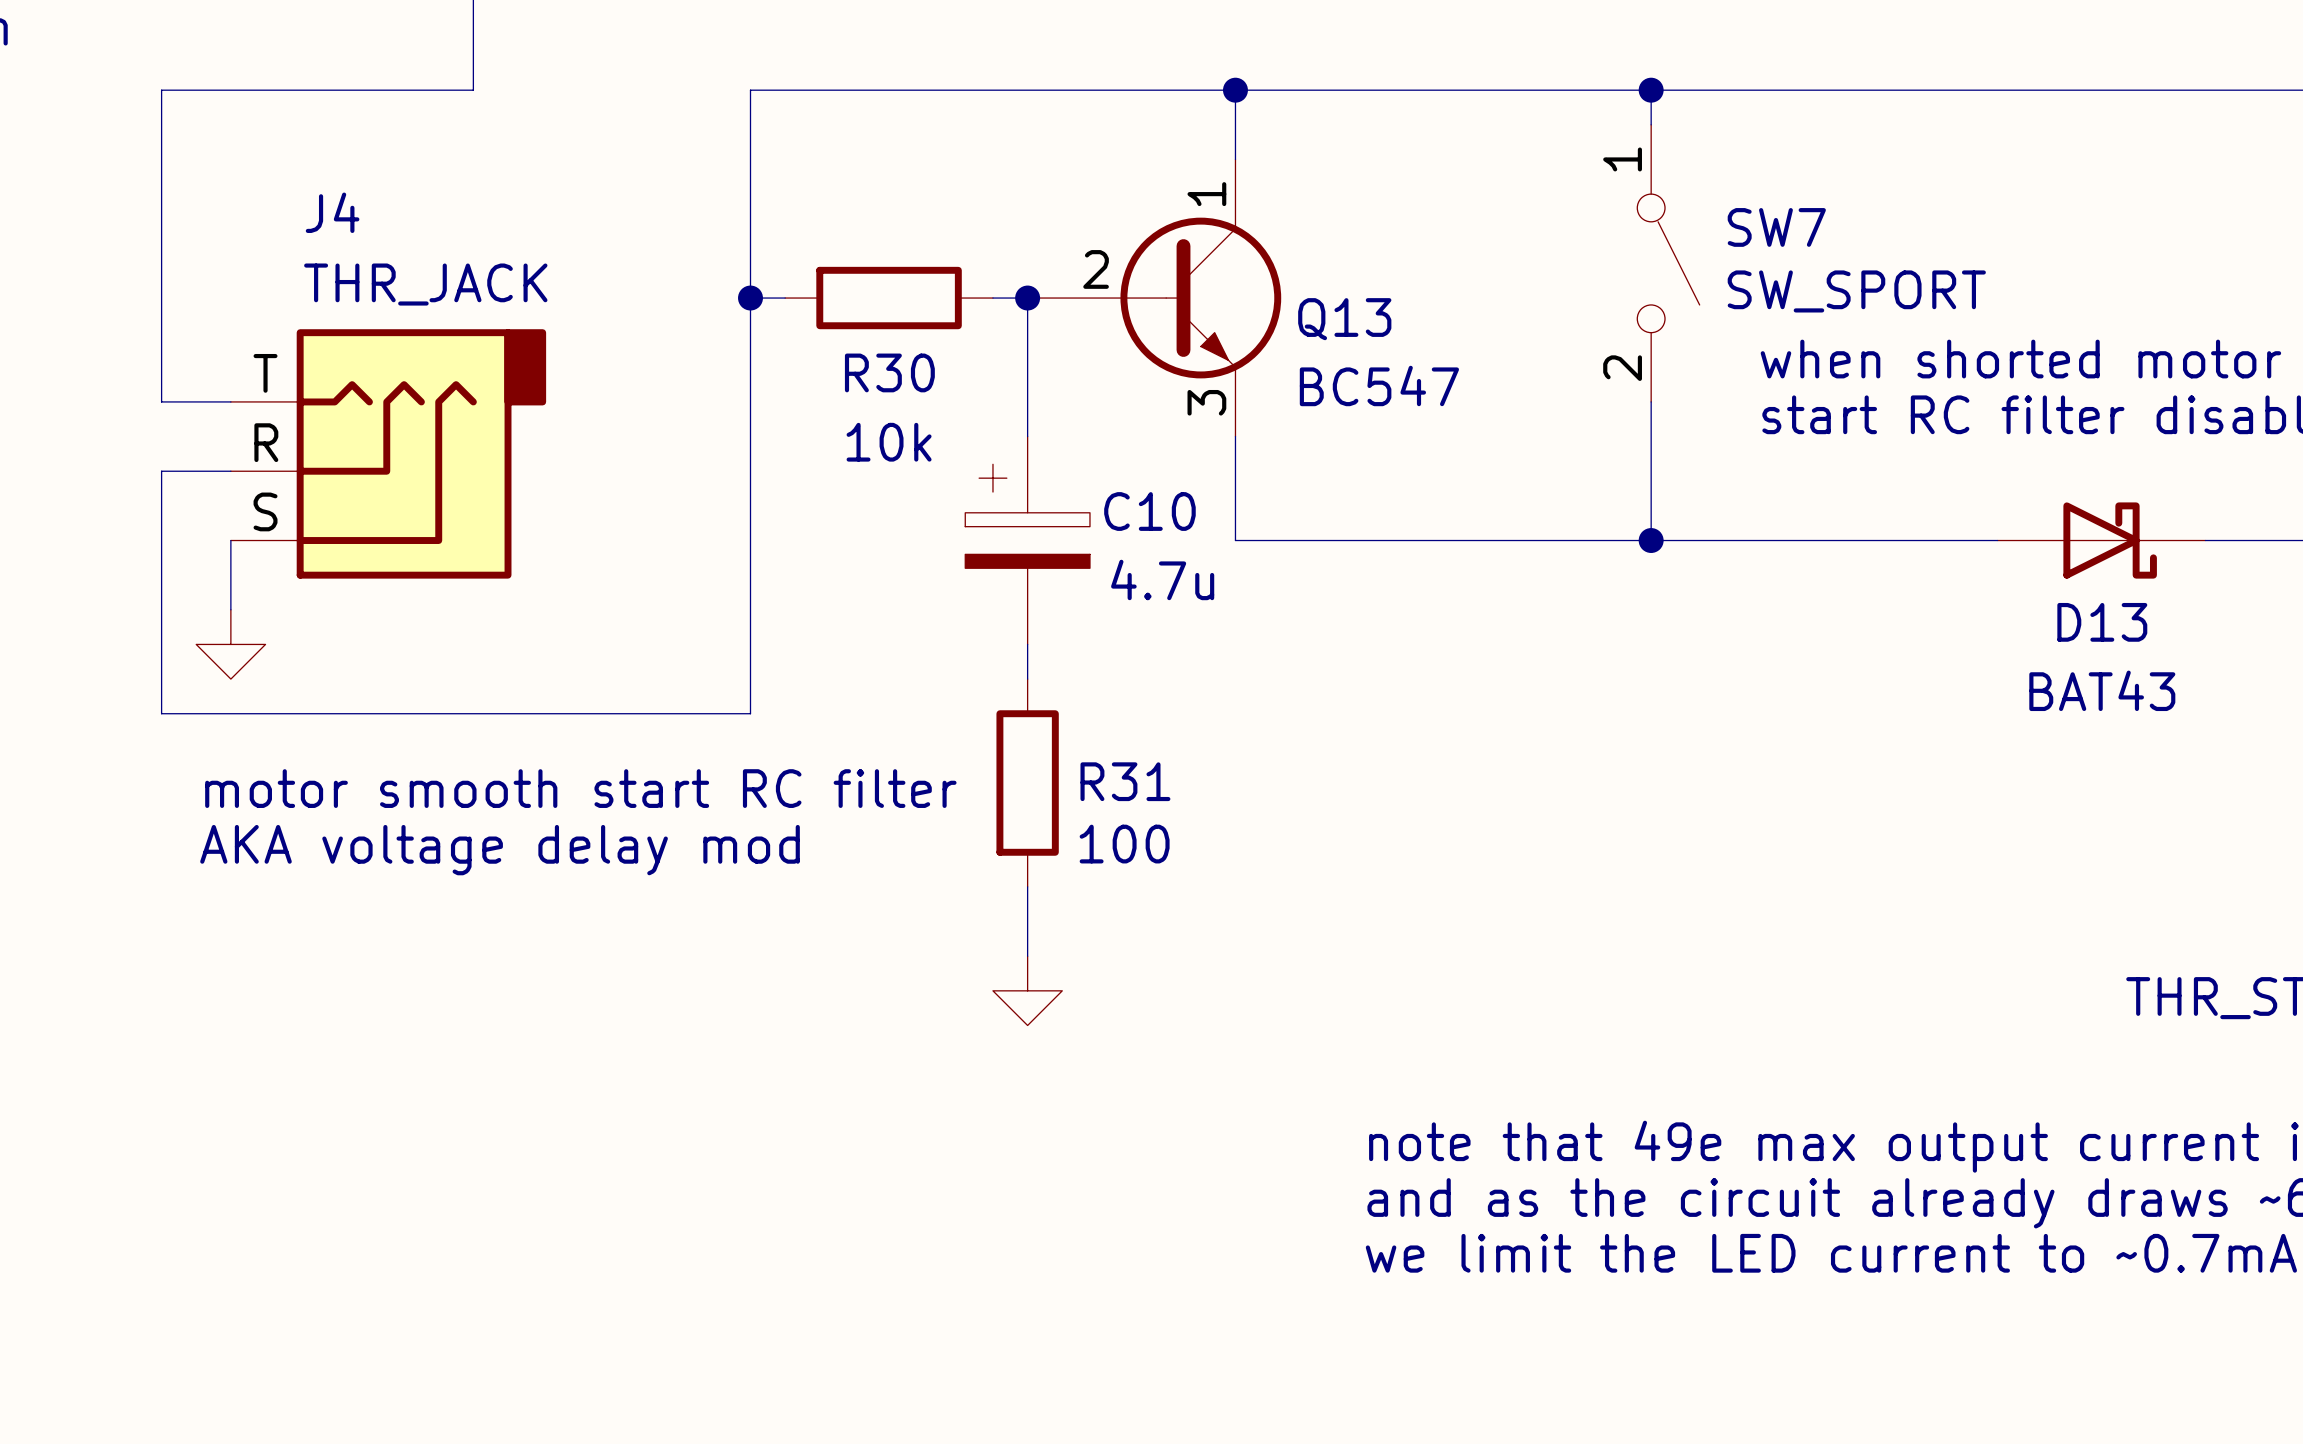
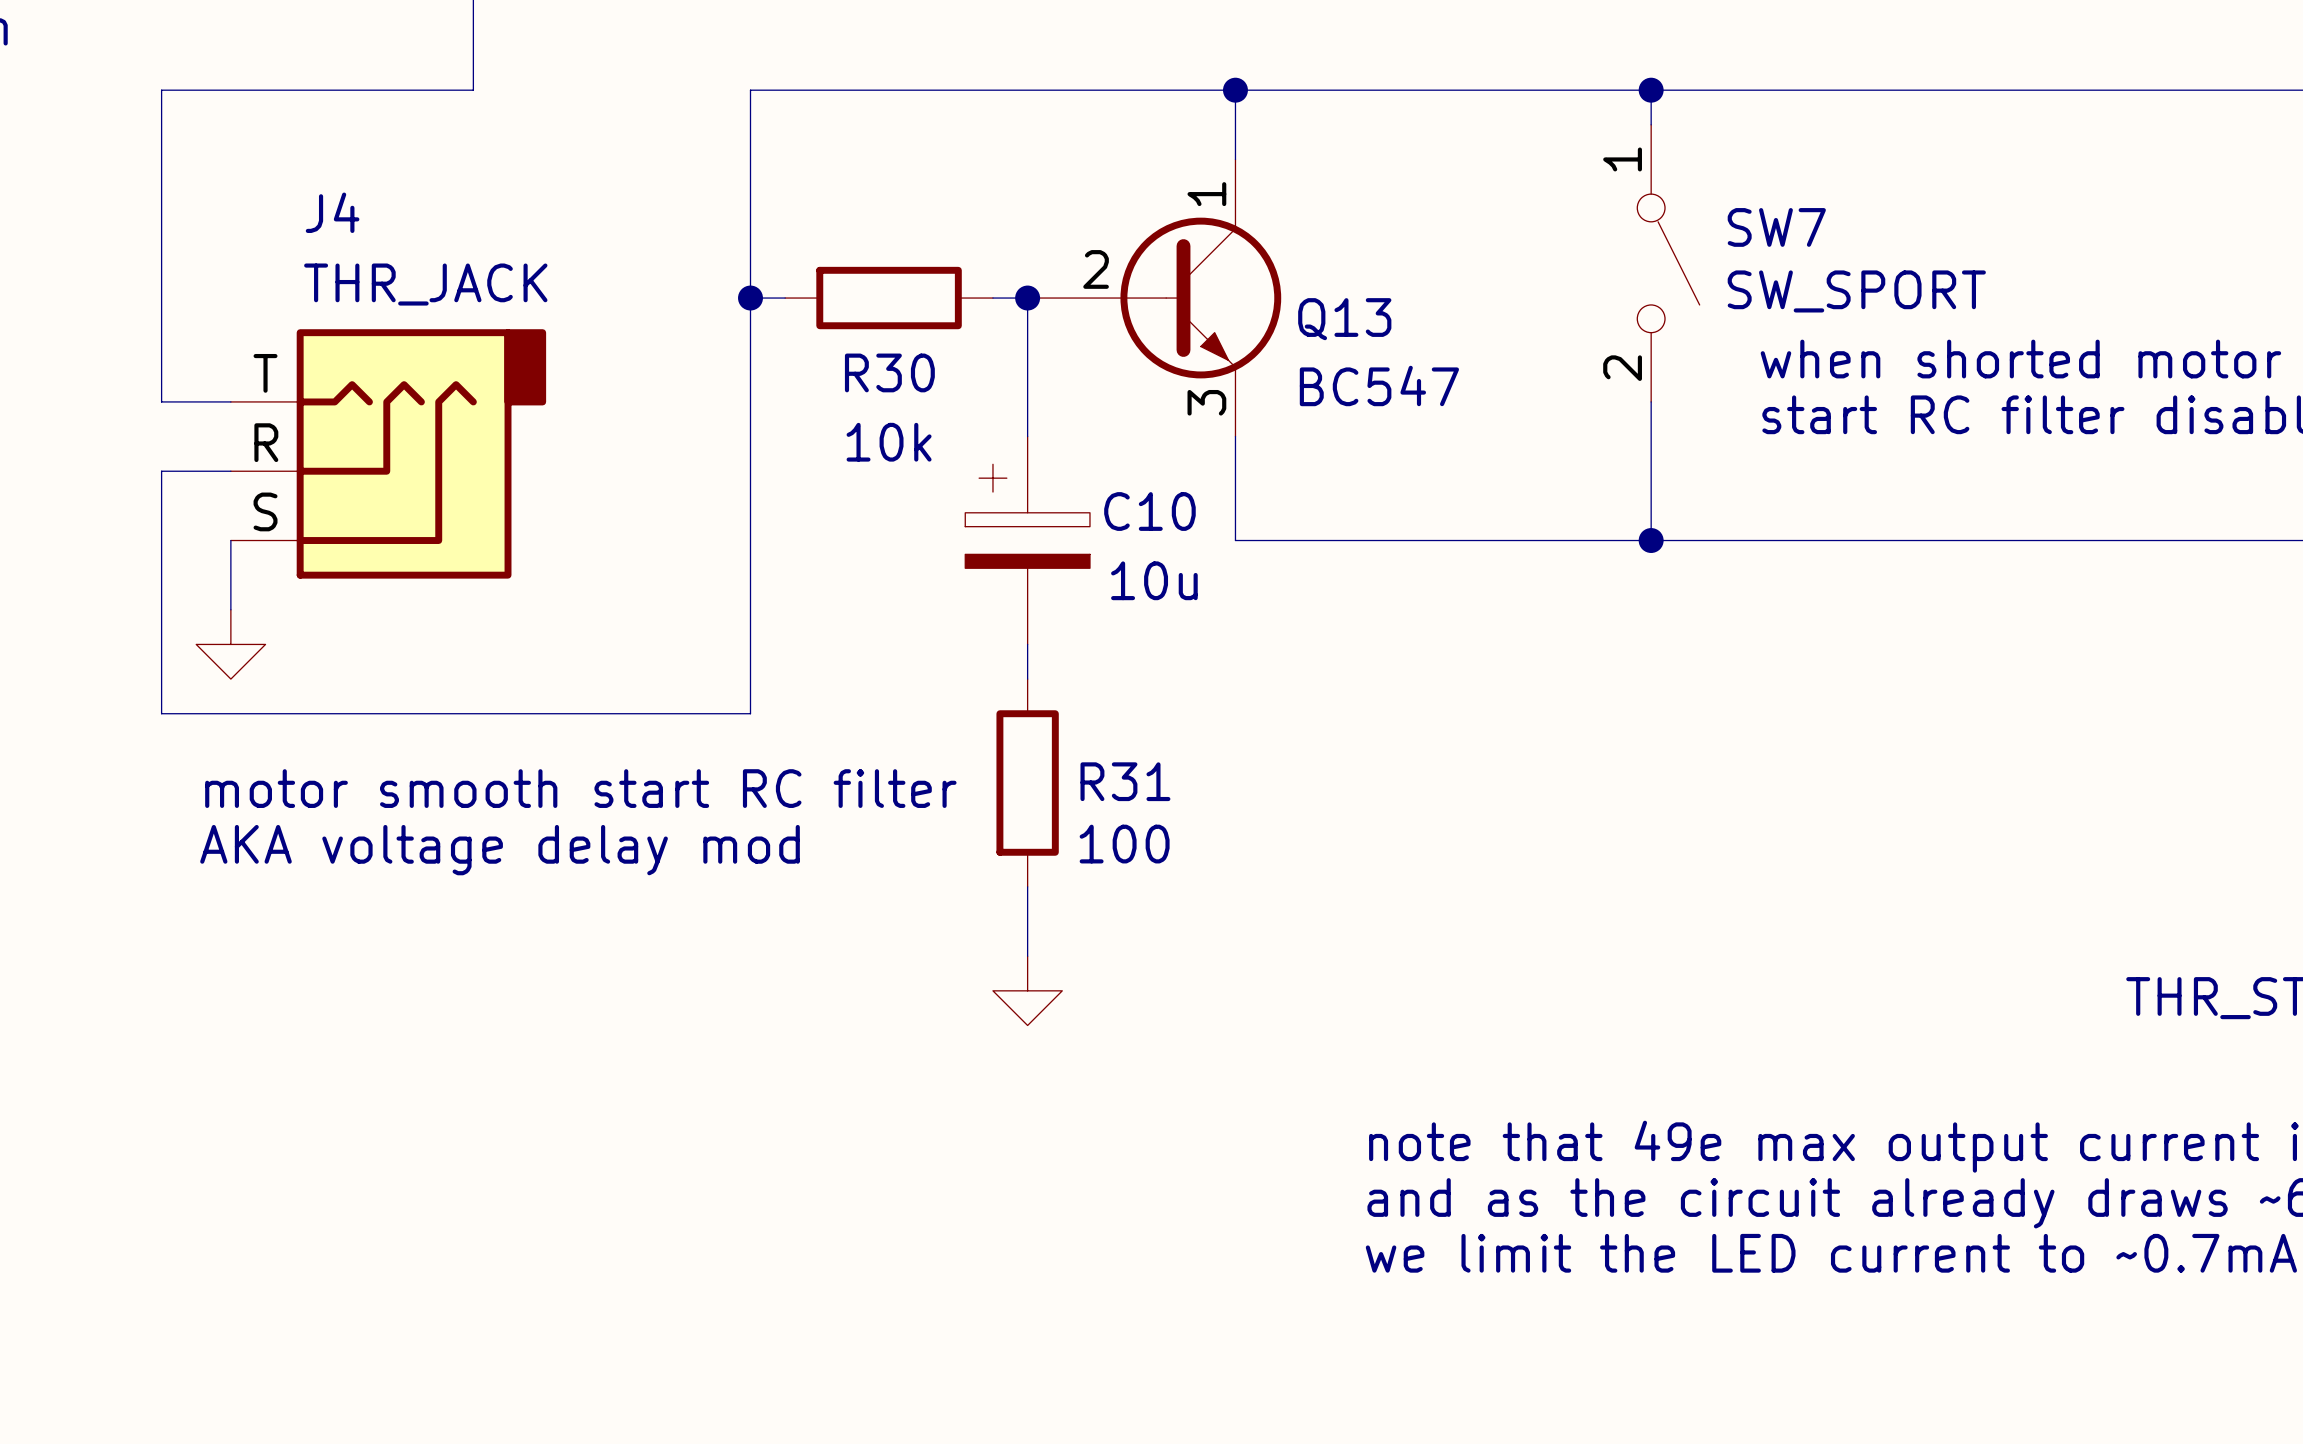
D13: BAT43 (2101, 540) -> none
C10 value: 4.7u (1162, 579) -> 10u (1154, 580)

